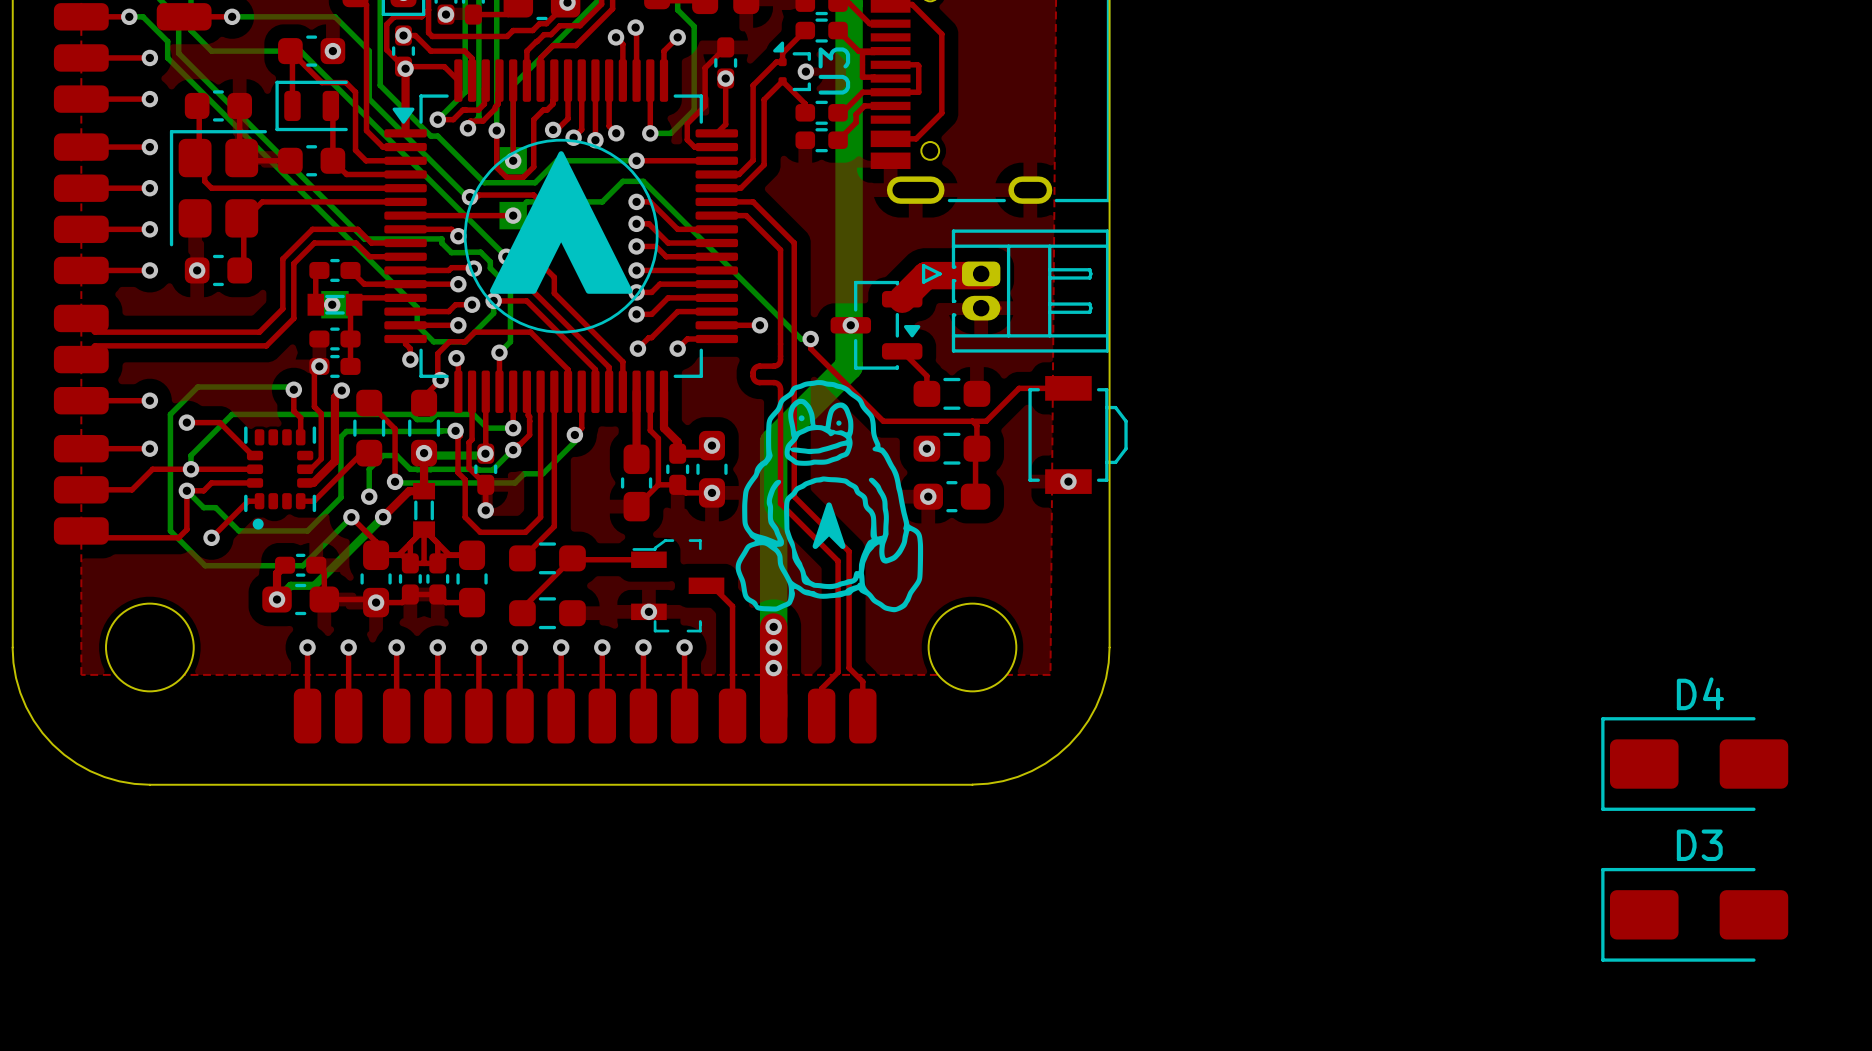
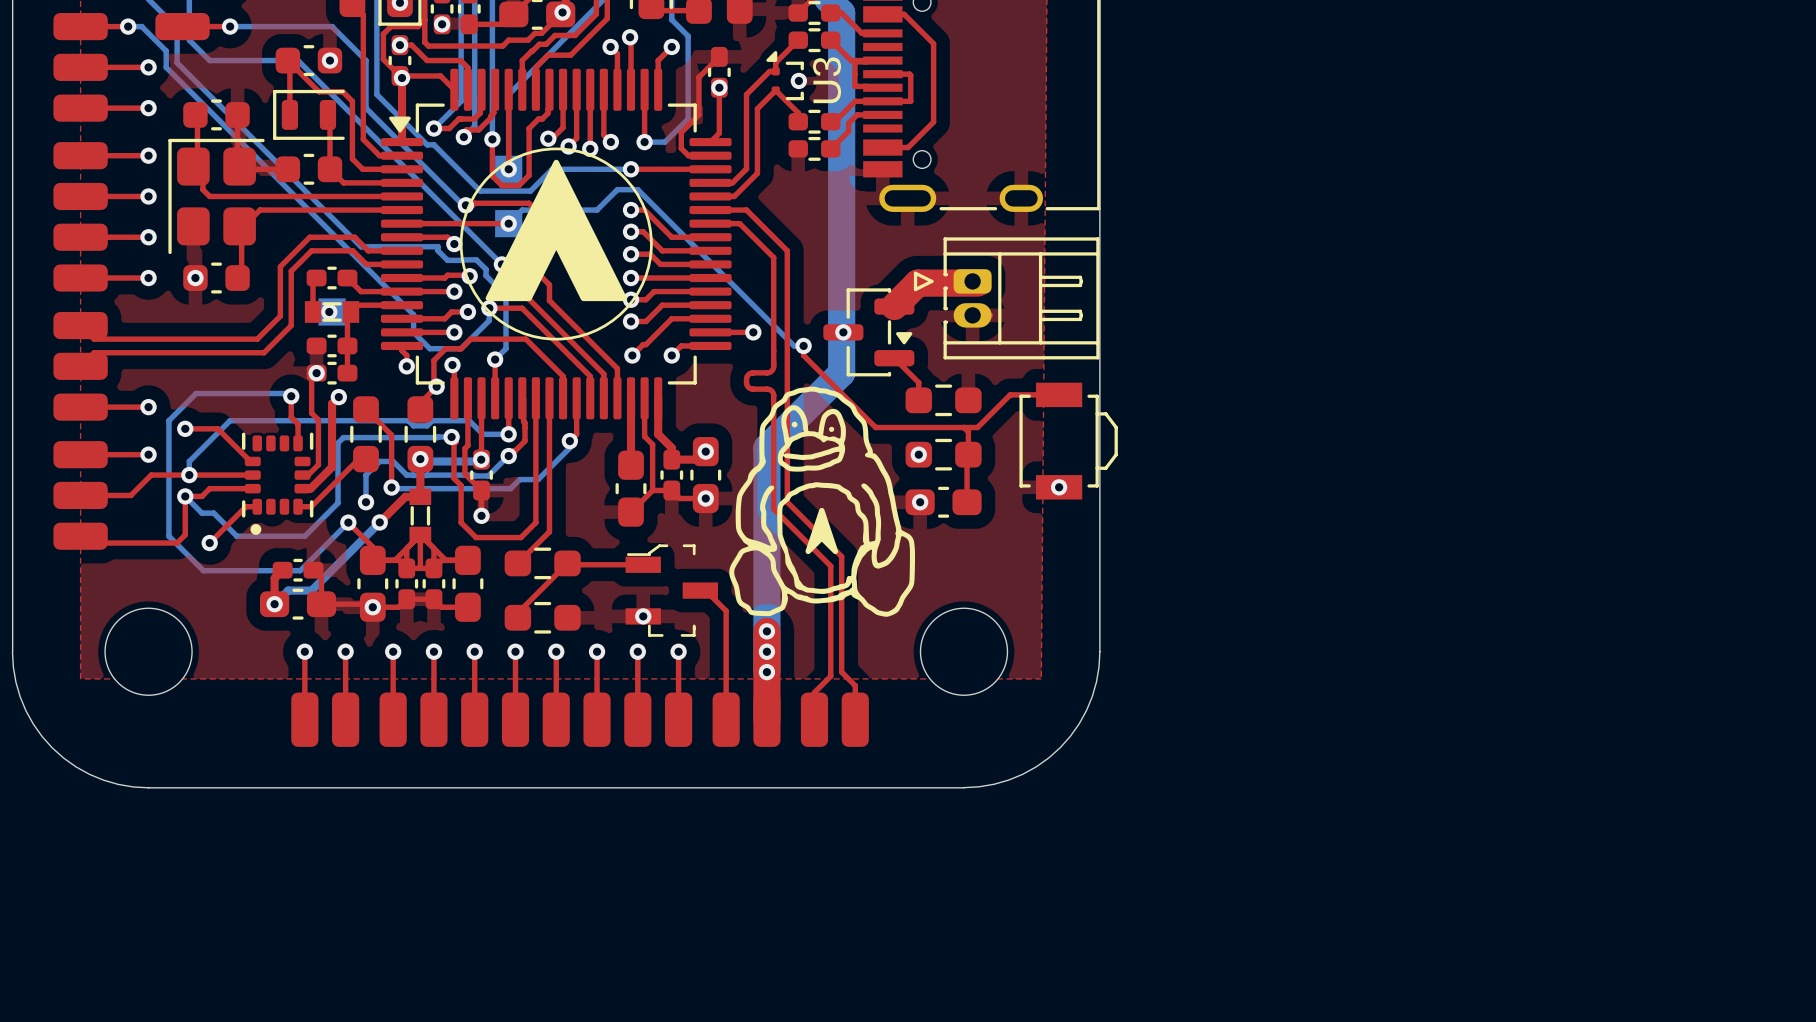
D4: (1694, 764) -> none
D3: (1694, 914) -> none

